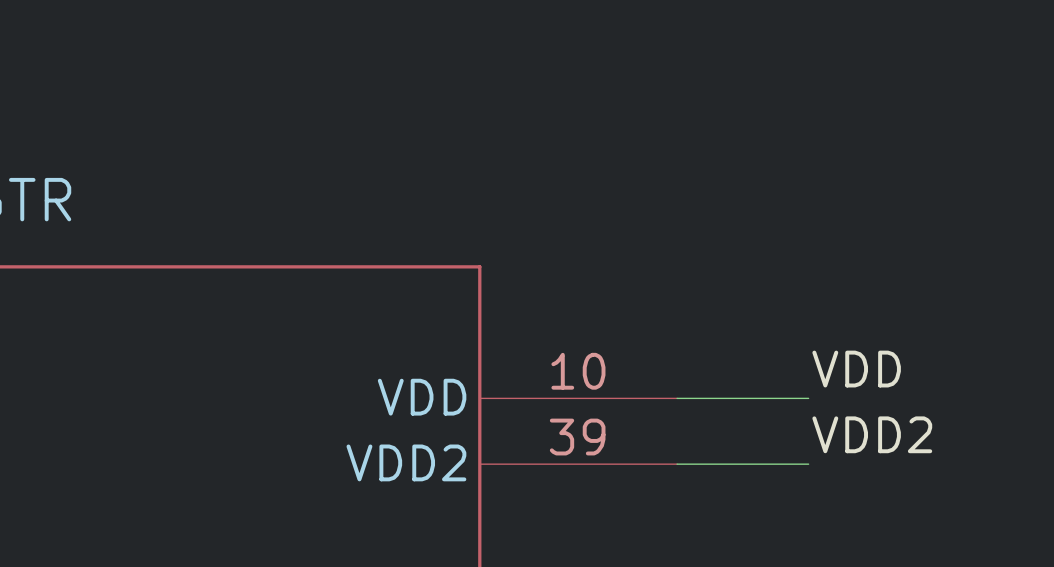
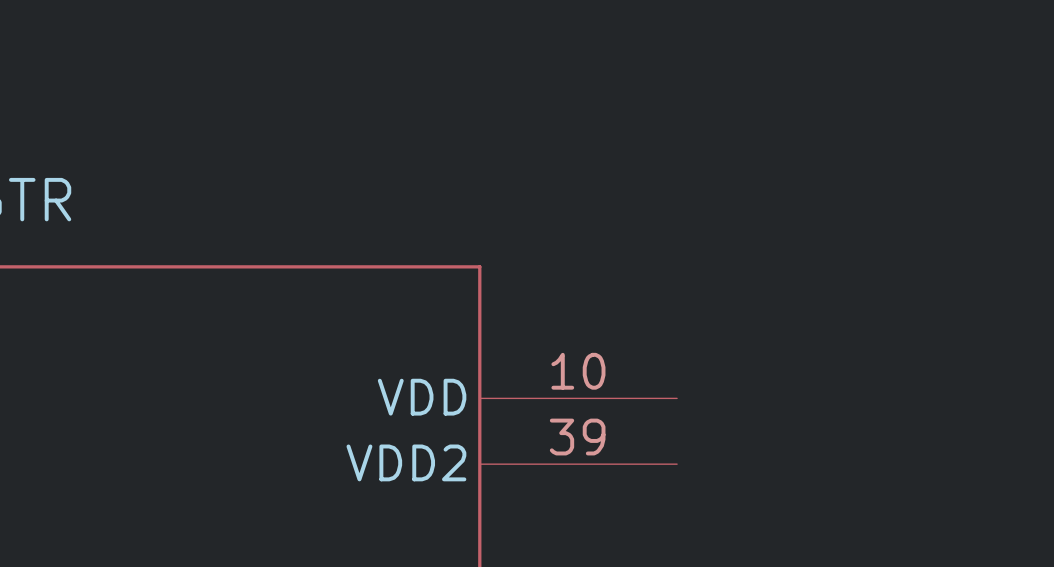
label: VDD (856, 369) -> none
wire: (677, 398) (808, 398) -> none
label: VDD2 (872, 434) -> none
wire: (677, 464) (808, 464) -> none

